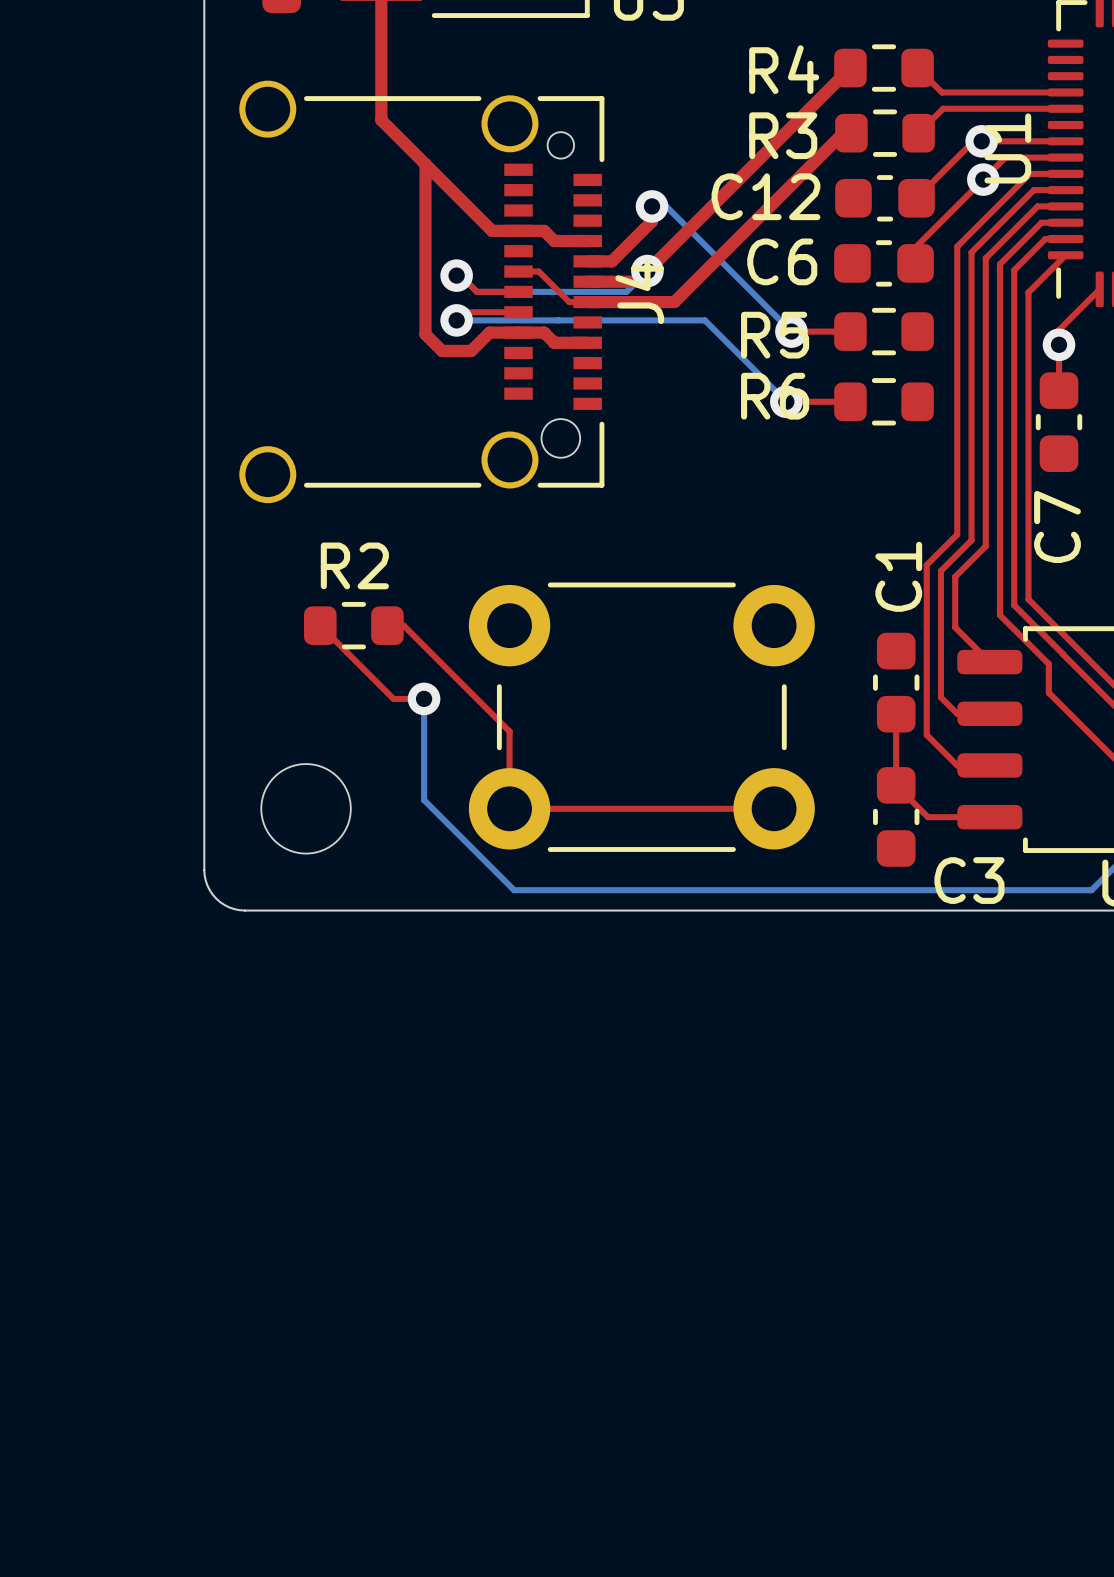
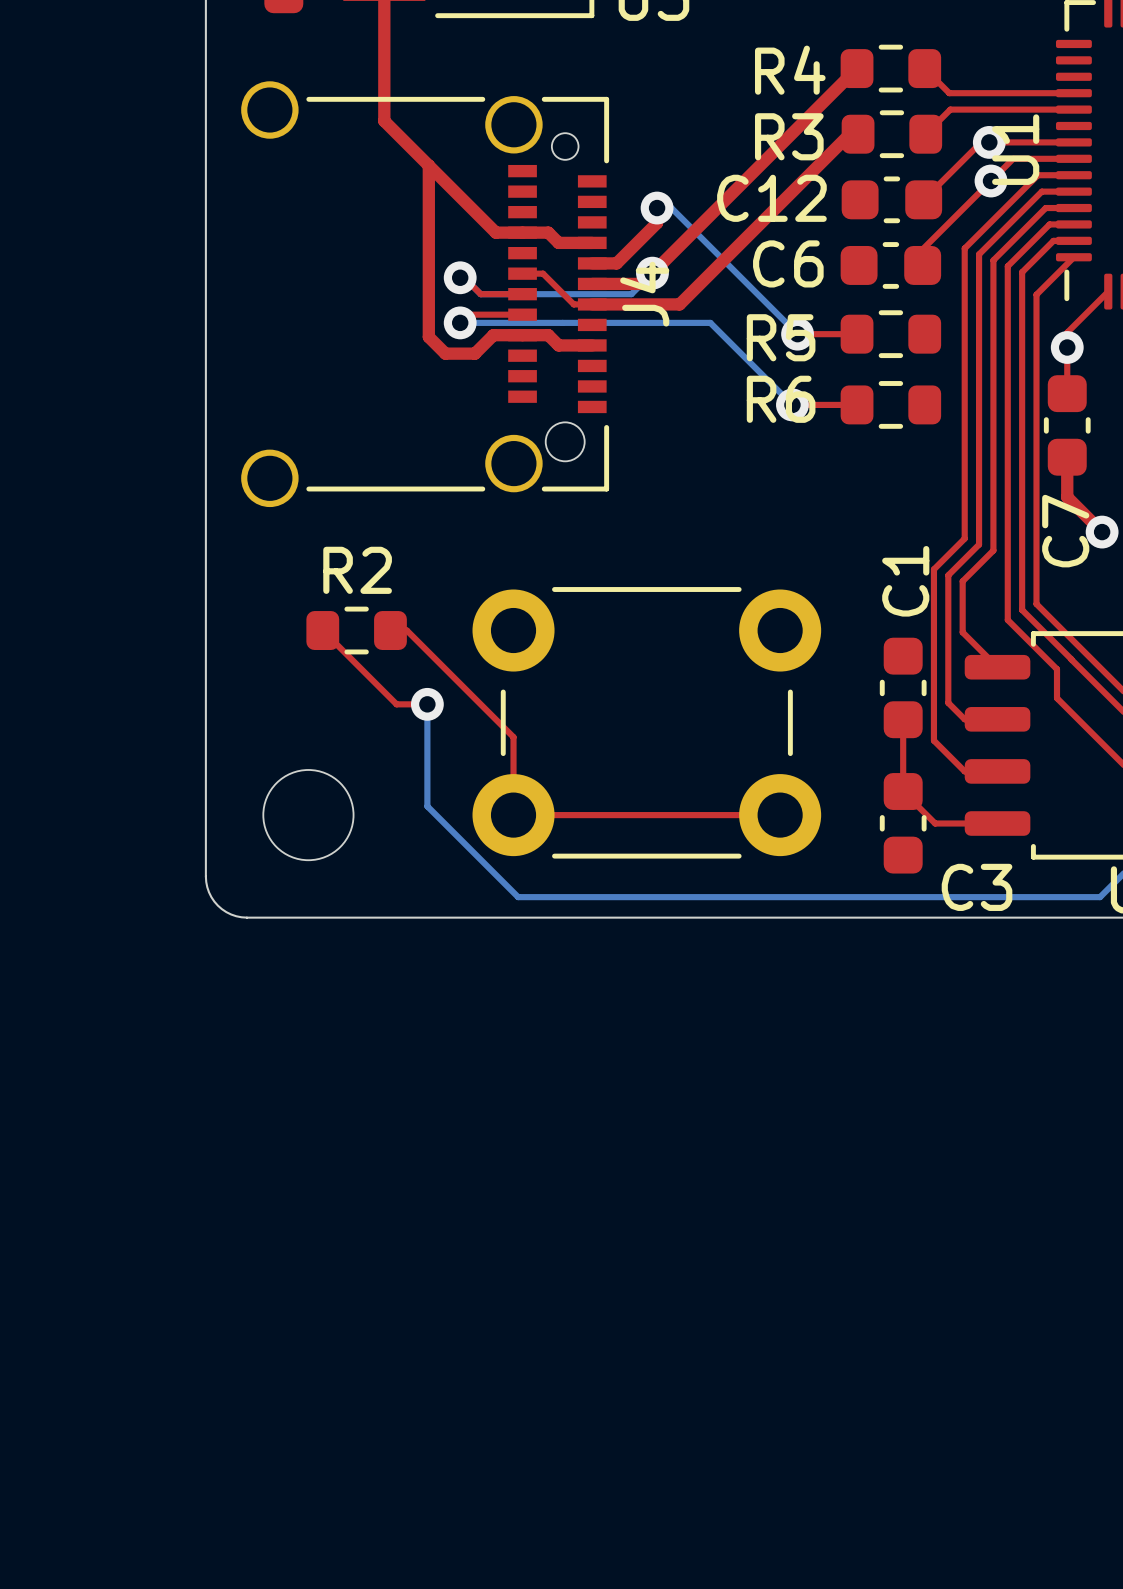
top track: none -> (1067, 457) (1067, 497) (1104, 534)
via: none -> (1102, 532)

